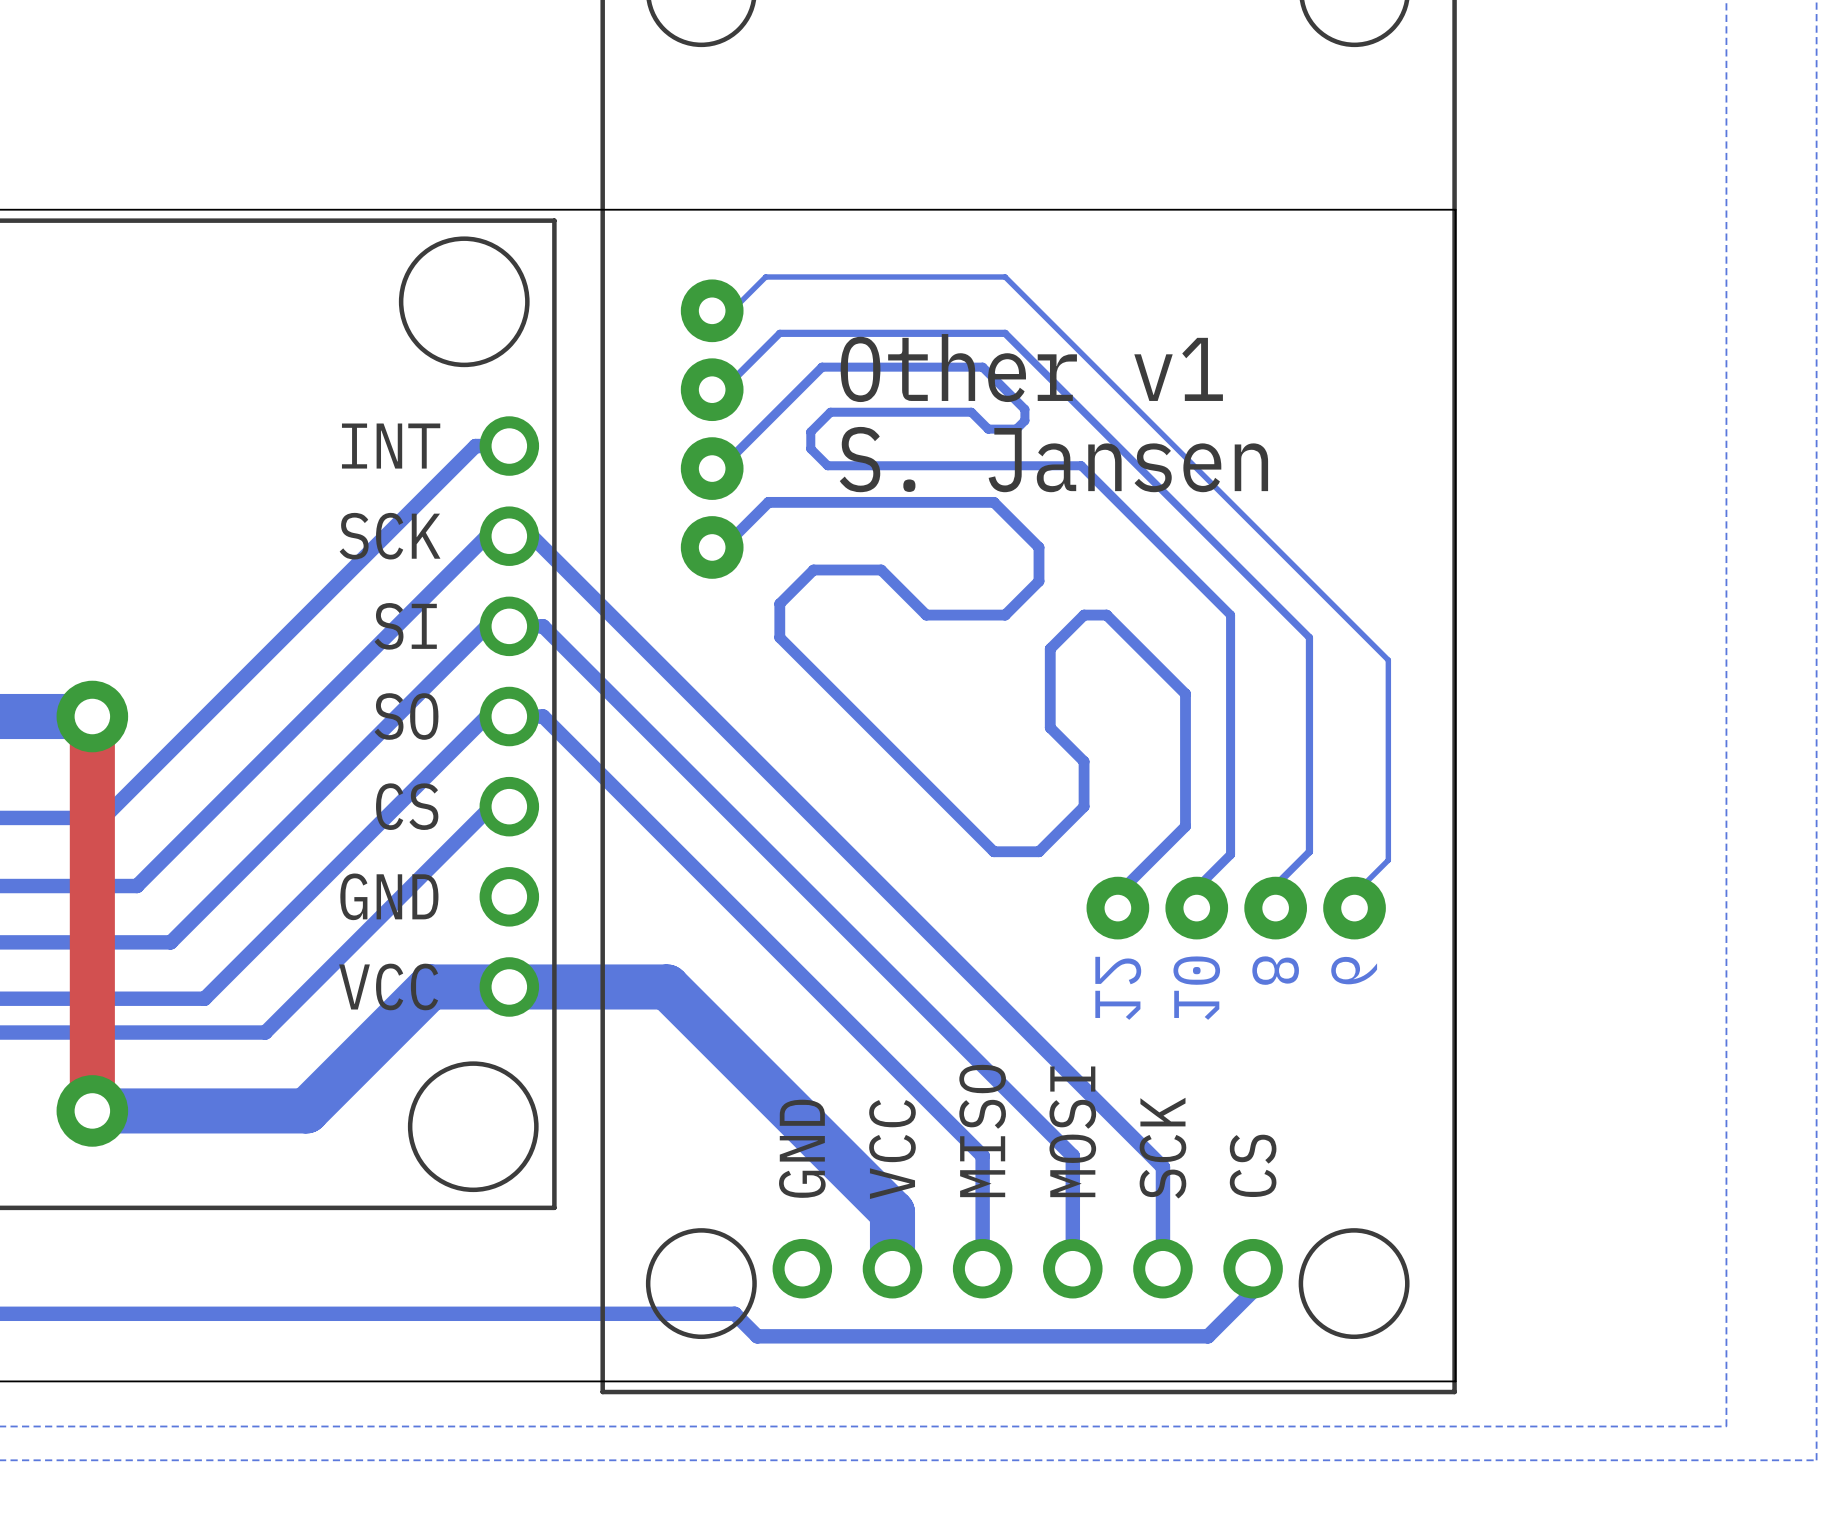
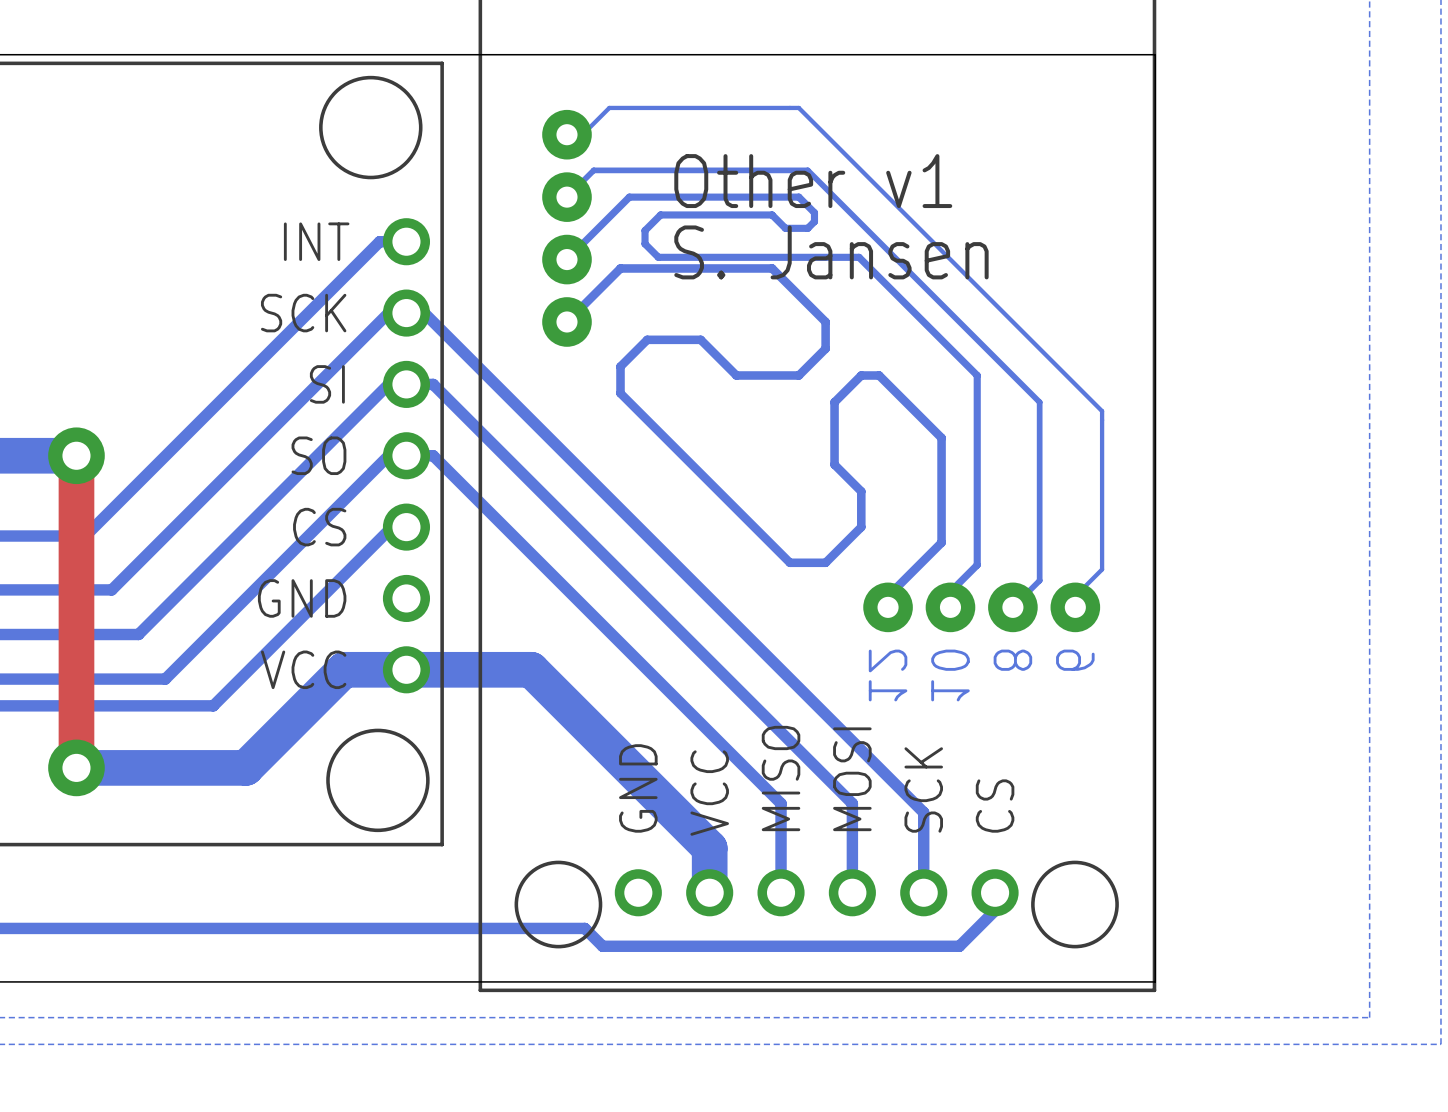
bottom track: (712, 389) (723, 389) (779, 333) (1005, 333) (1309, 637) (1309, 648) -> (566, 197) (593, 170) (807, 170) (1039, 402)
bottom track: (1005, 389) (982, 367) (822, 367) (720, 468) (712, 468) -> (798, 197) (629, 197) (566, 259)
bottom track: (993, 502) (768, 502) (723, 547) (712, 547) -> (789, 286) (772, 268) (620, 268) (566, 321)
bottom track: (1309, 851) (1275, 885) (1275, 908) -> (1039, 562) (1039, 580) (1012, 607)

